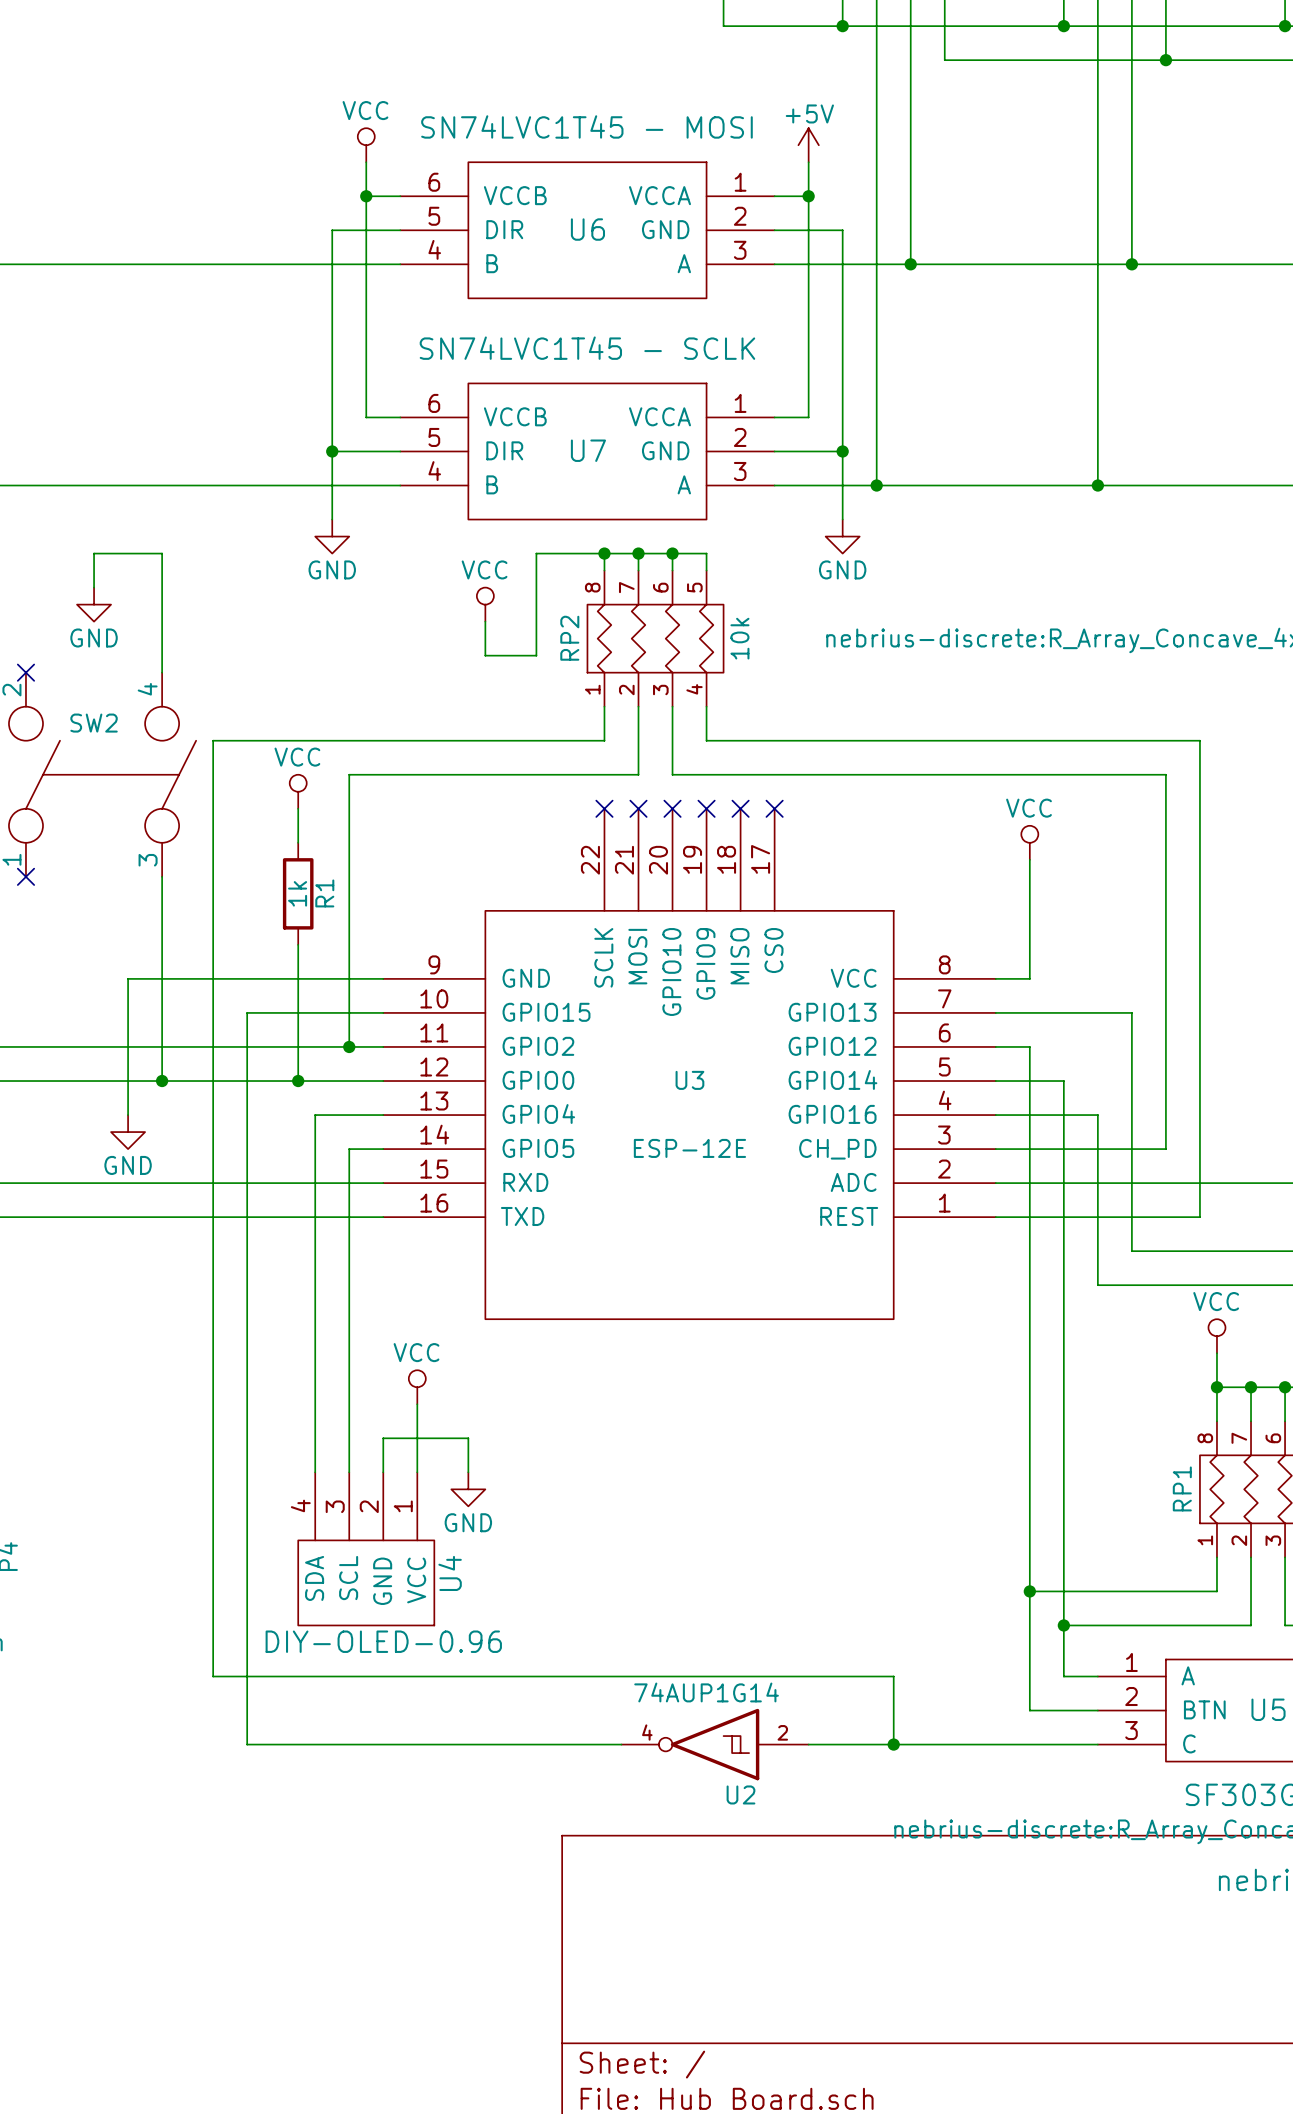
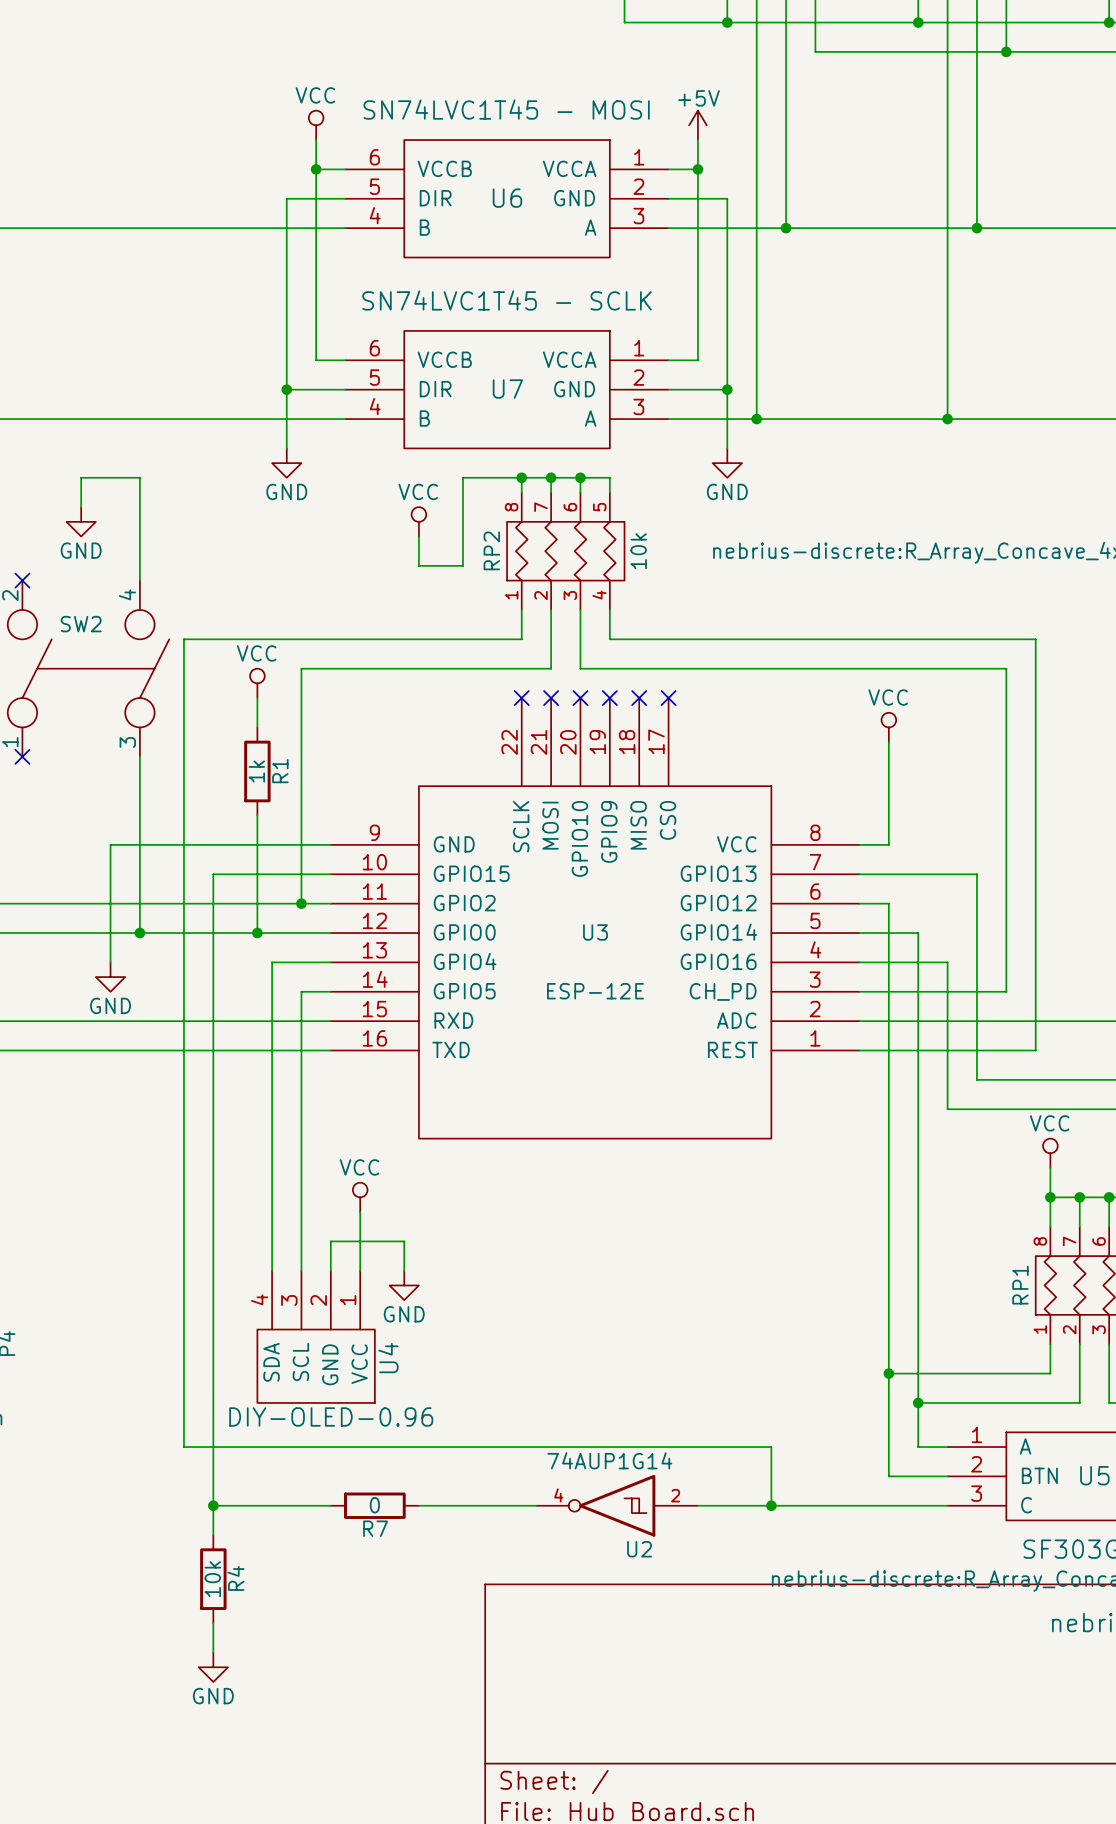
wire: none -> (213, 1505) (213, 1535)
junction: none -> (213, 1505)
wire: (383, 1744) (485, 1744) -> none
R7: none -> 0 (374, 1505)
R4: none -> 10k (213, 1579)
wire: none -> (213, 1623) (213, 1652)
power symbol: none -> GND (213, 1667)

